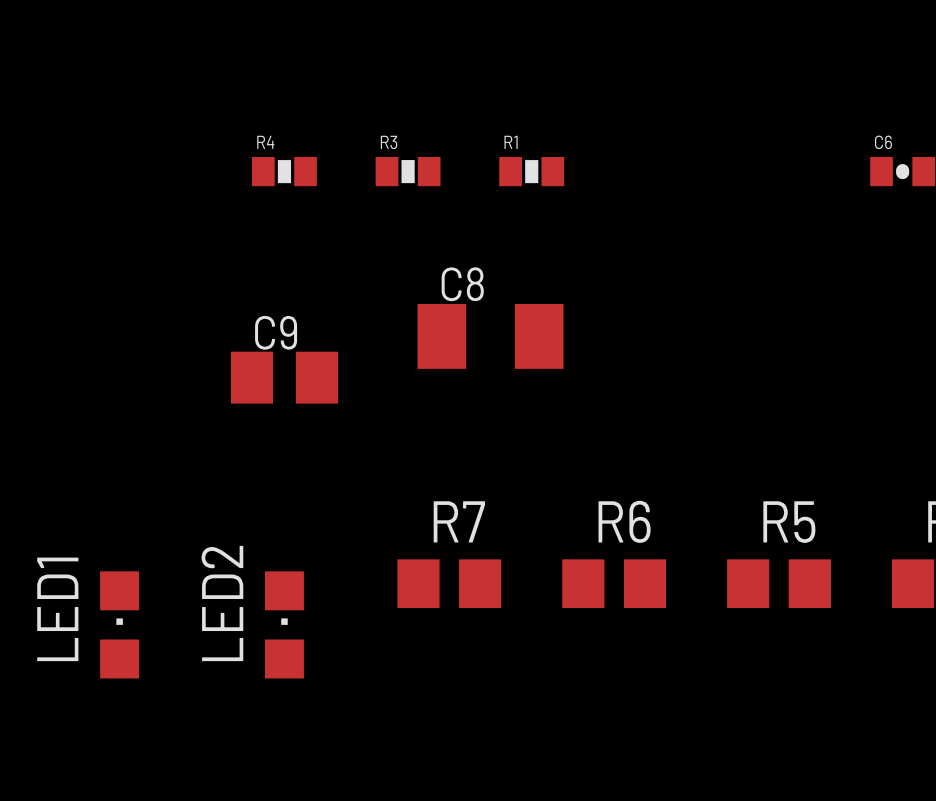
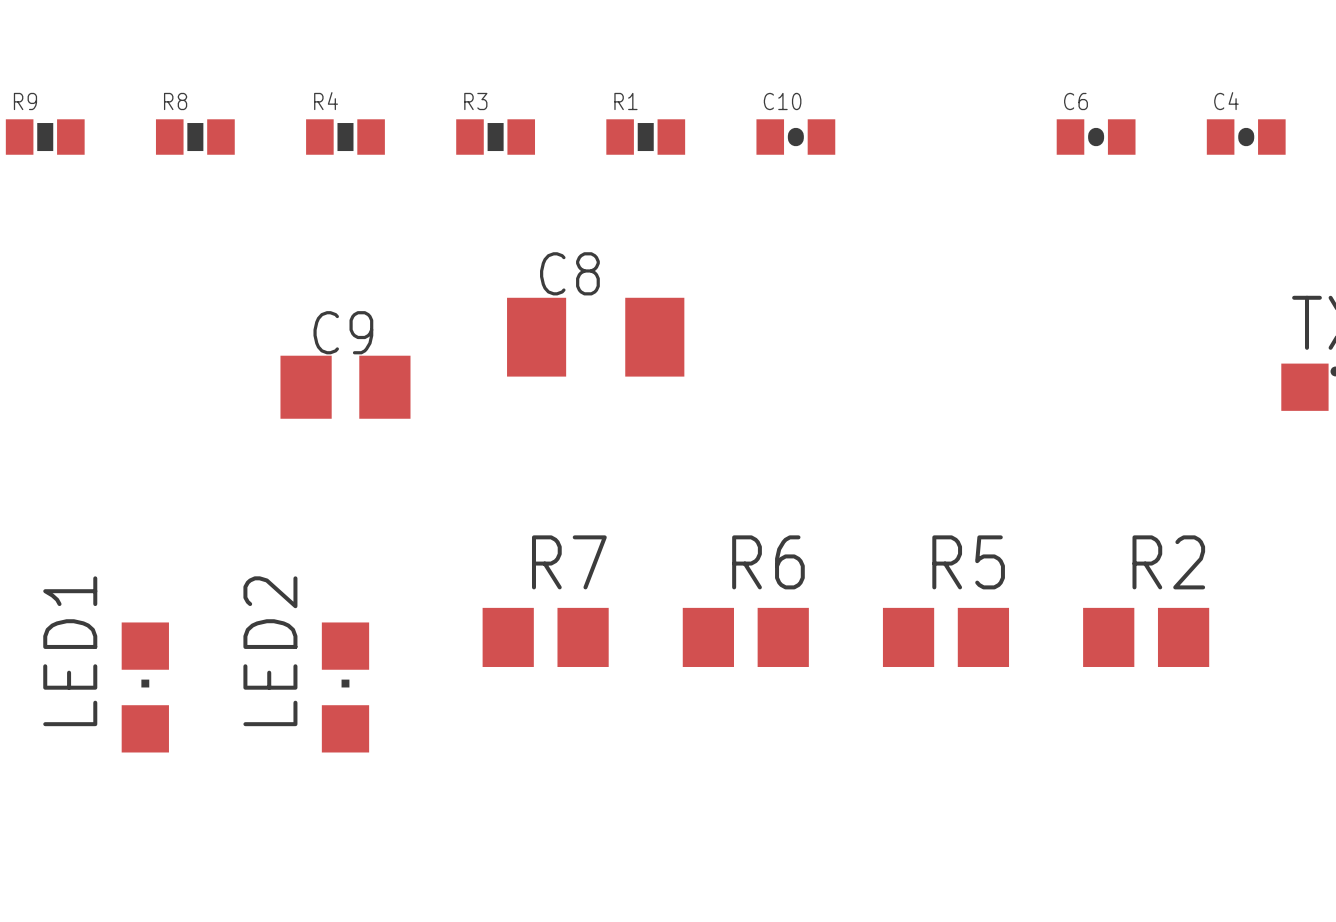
R9: none -> (45, 137)
R8: none -> (195, 137)
C10: none -> (795, 137)

